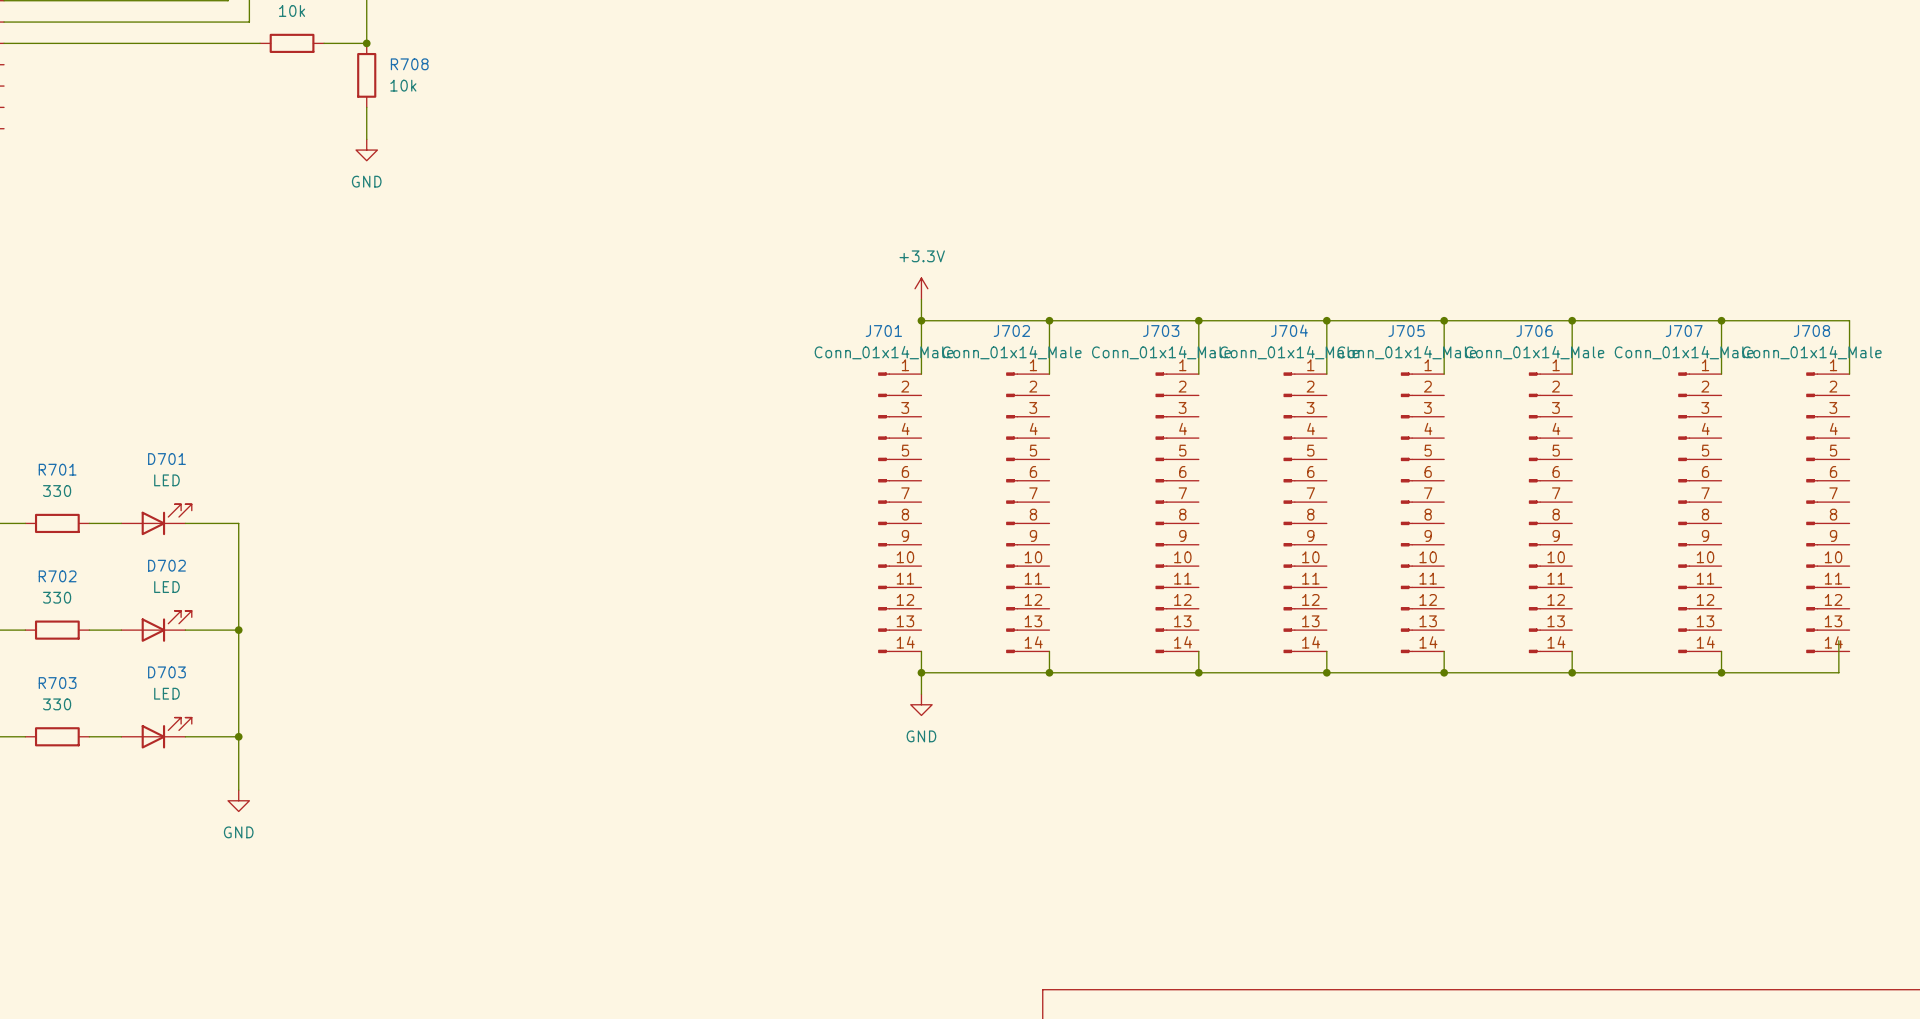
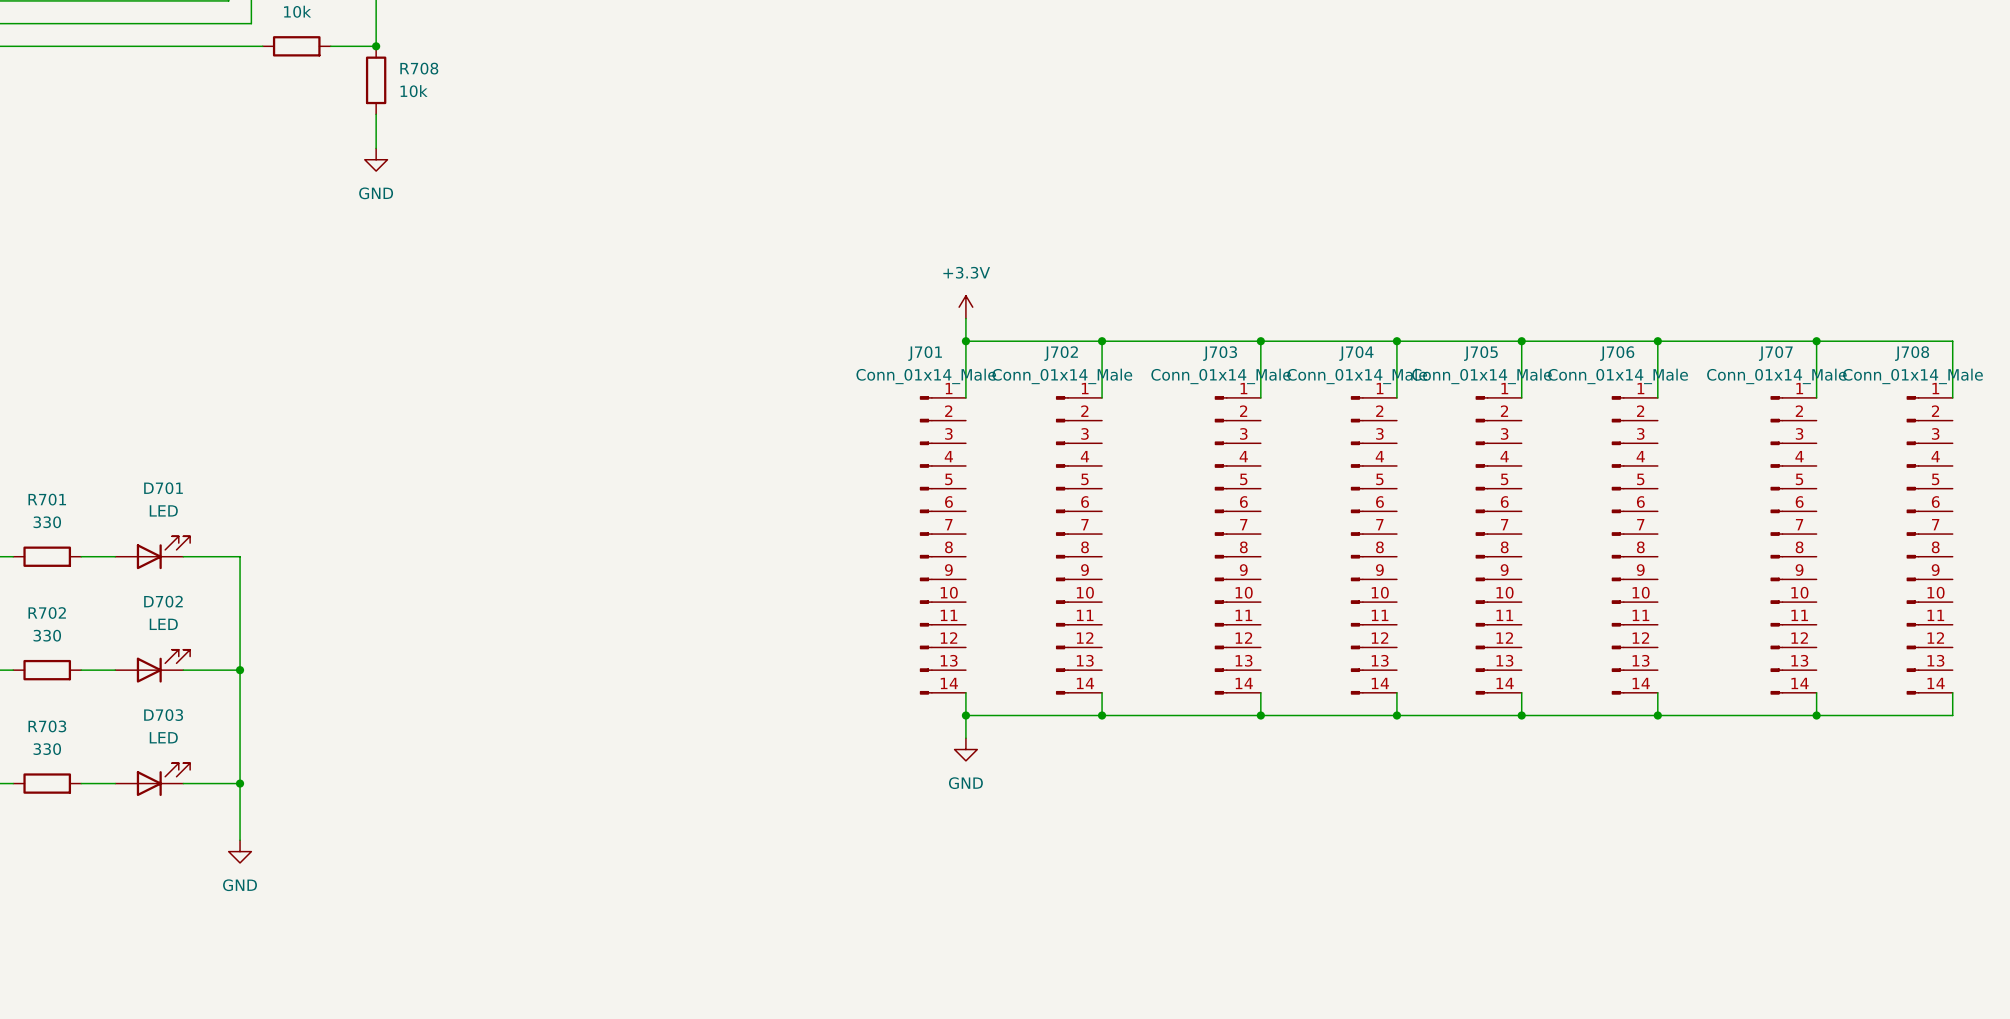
wire: (1838, 640) (1838, 672) -> (1952, 692) (1952, 715) (1941, 715)

